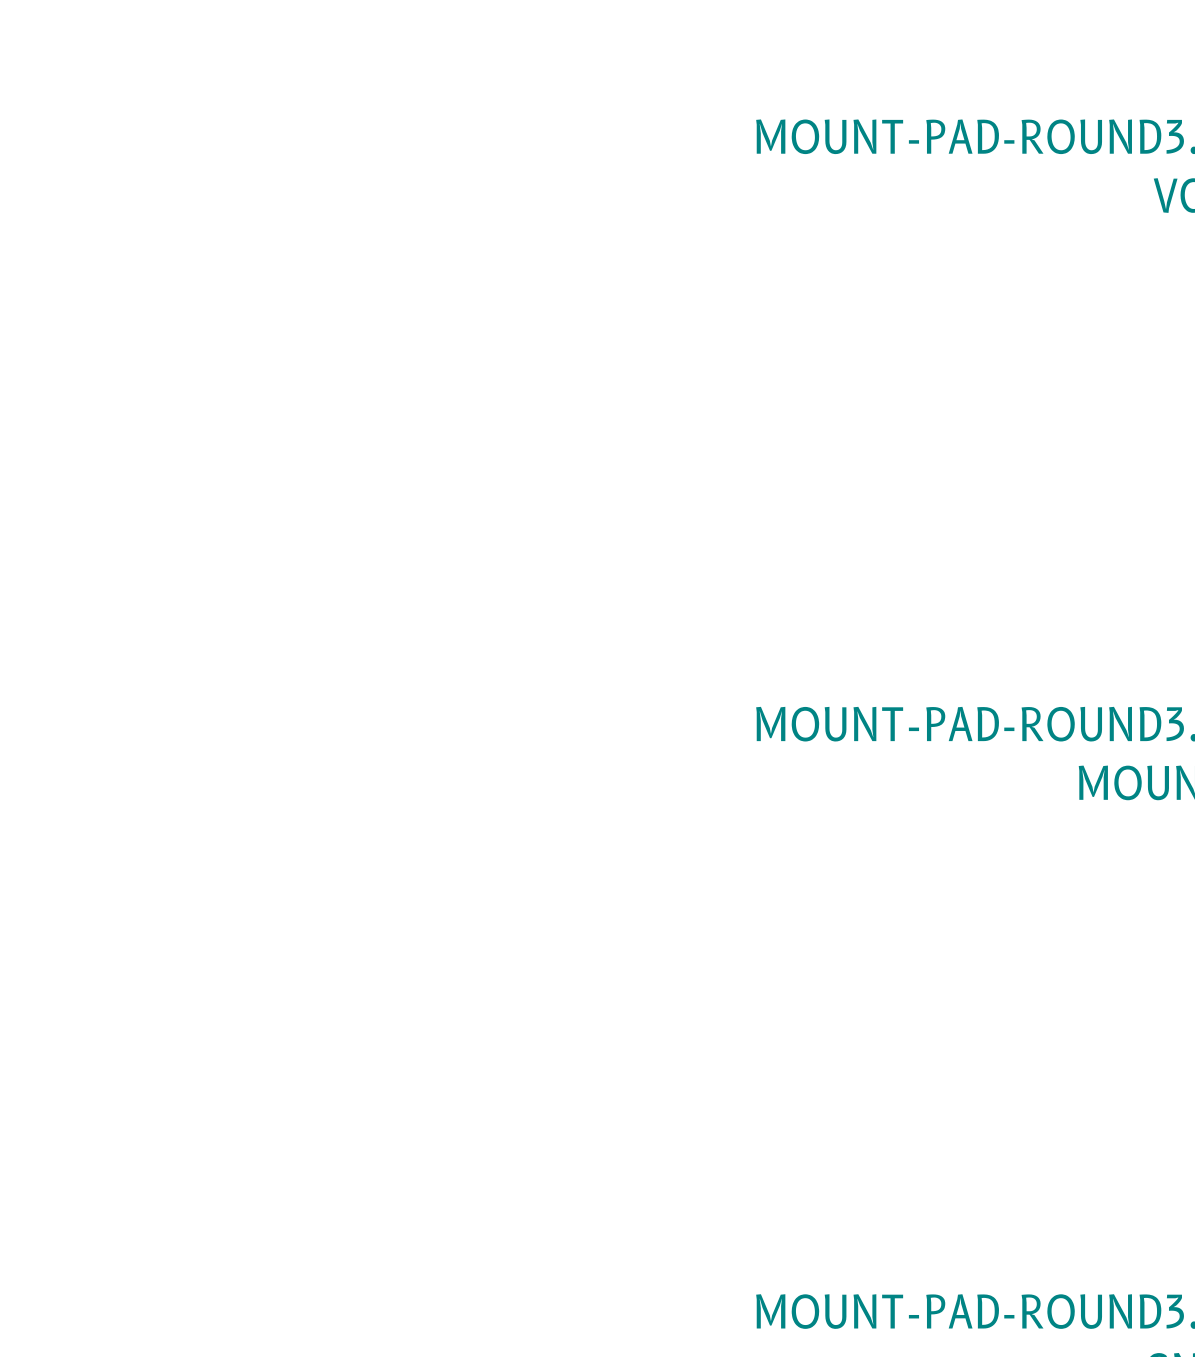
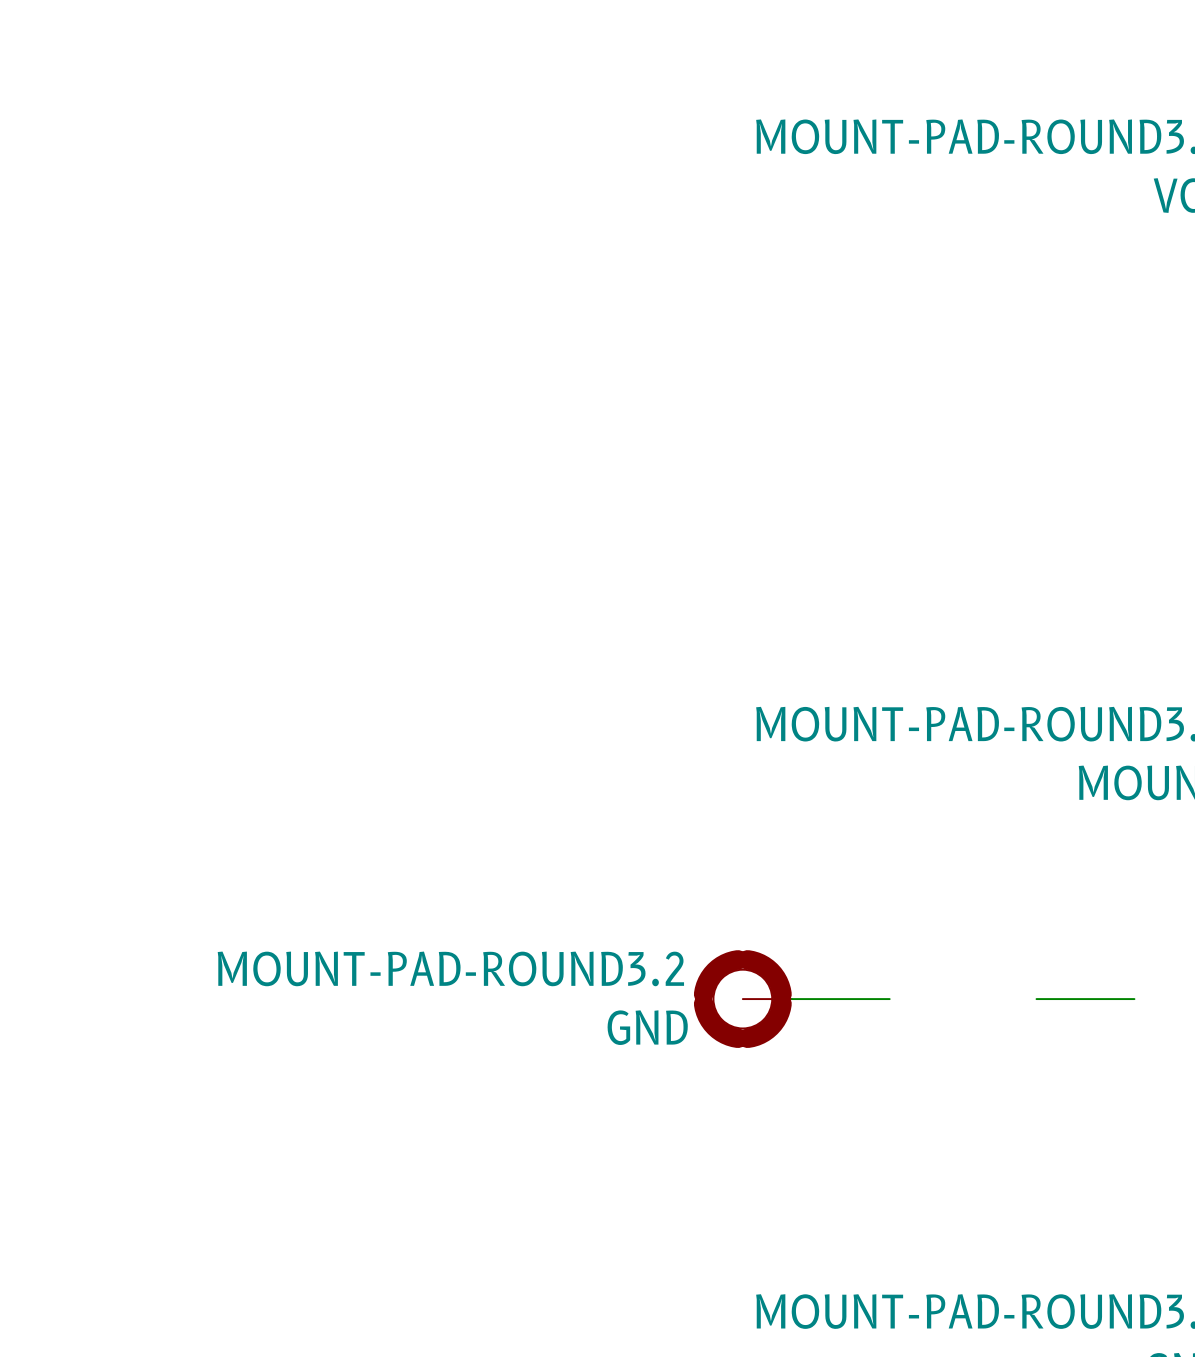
GND: none -> MOUNT-PAD-ROUND3.2 (742, 999)
wire: none -> (791, 999) (889, 999)
wire: none -> (1036, 999) (1134, 999)

